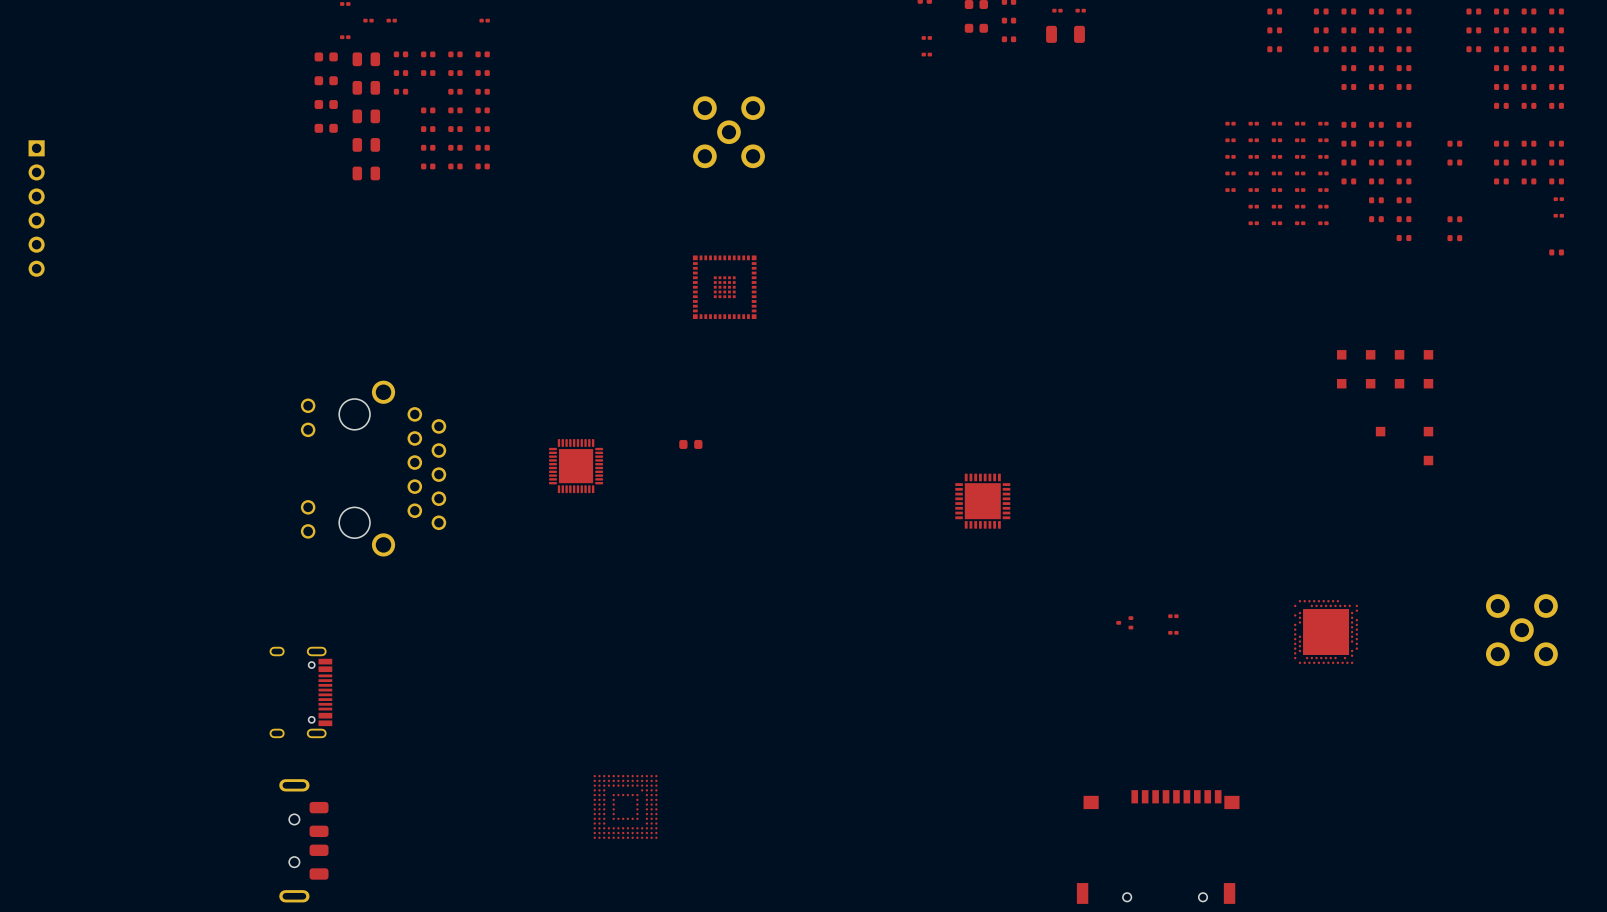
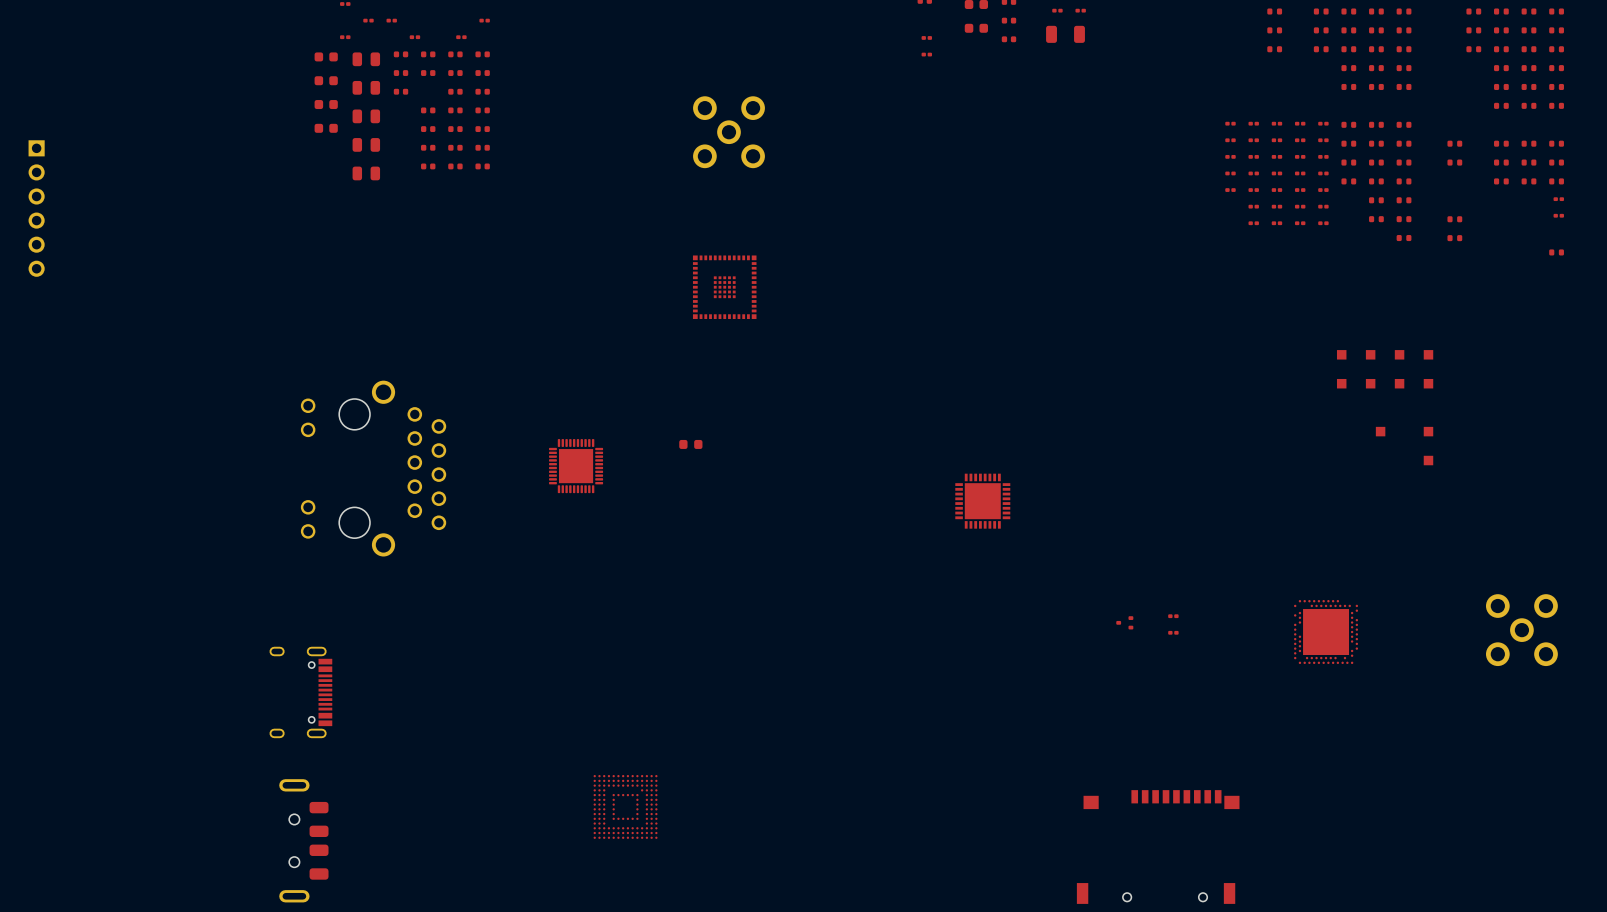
part: none -> (414, 37)
part: none -> (461, 37)

